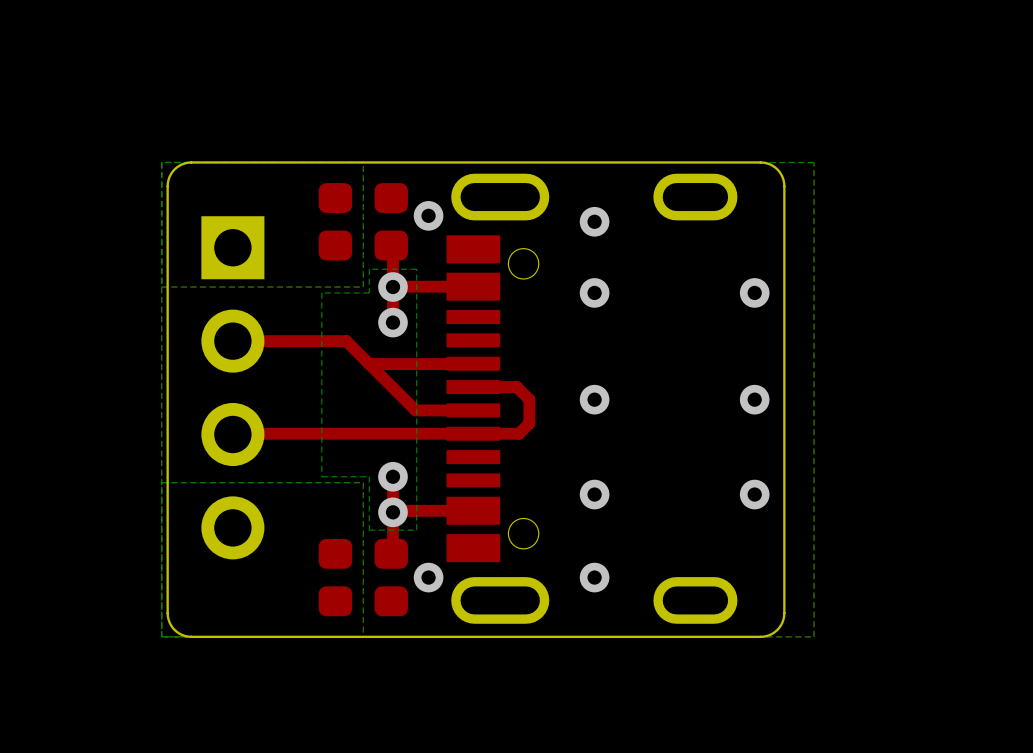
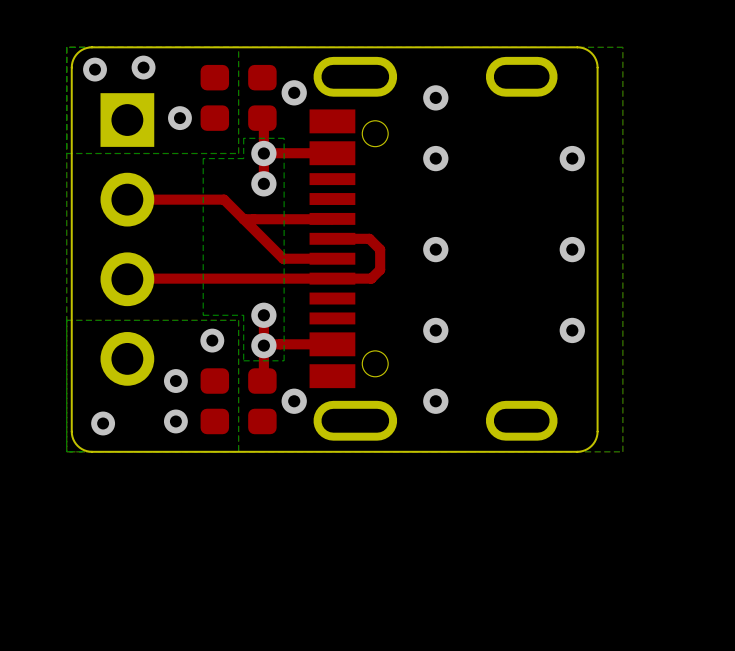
via: none -> (143, 67)
via: none -> (95, 69)
via: none -> (179, 118)
via: none -> (212, 340)
via: none -> (175, 381)
via: none -> (175, 421)
via: none -> (103, 423)

